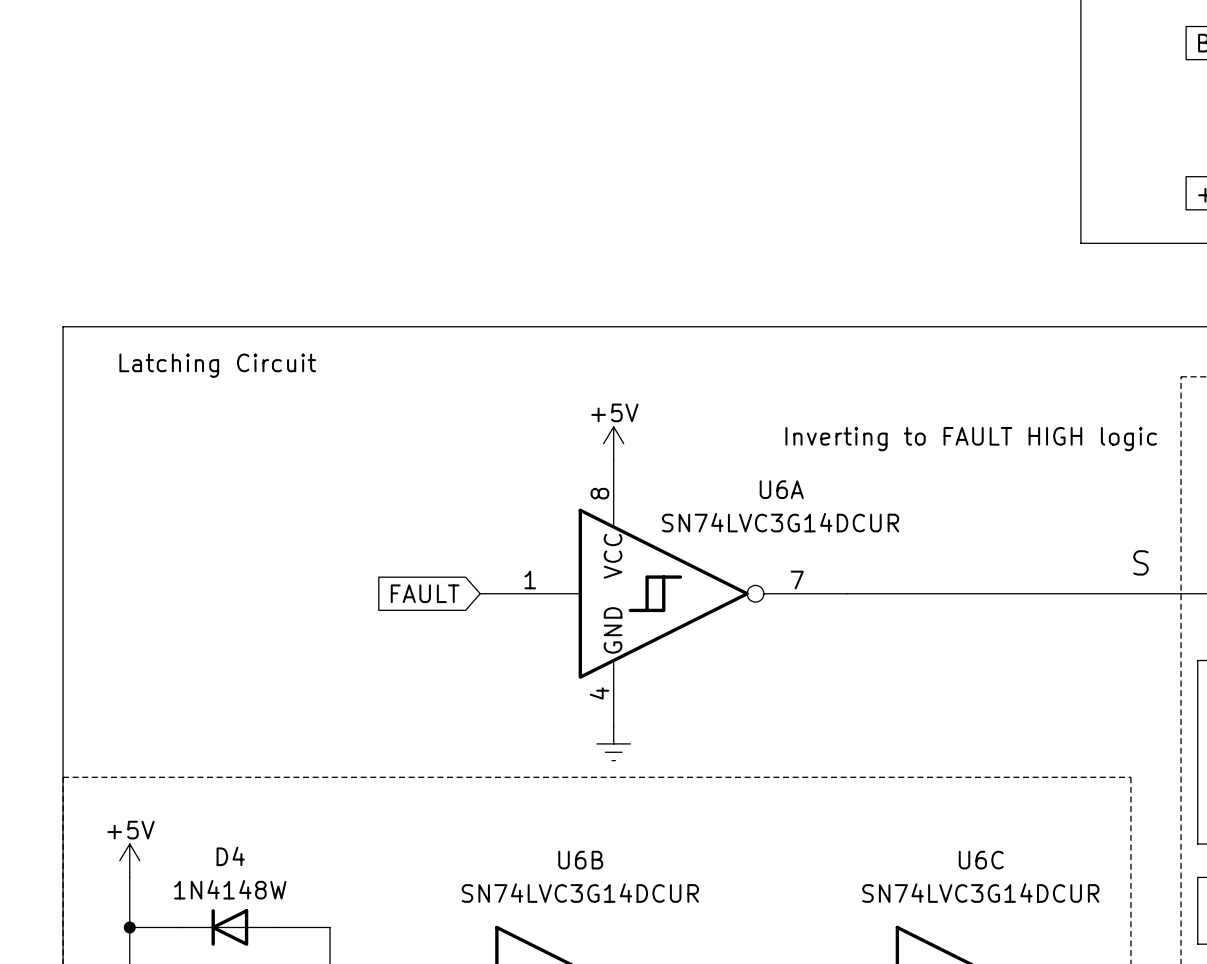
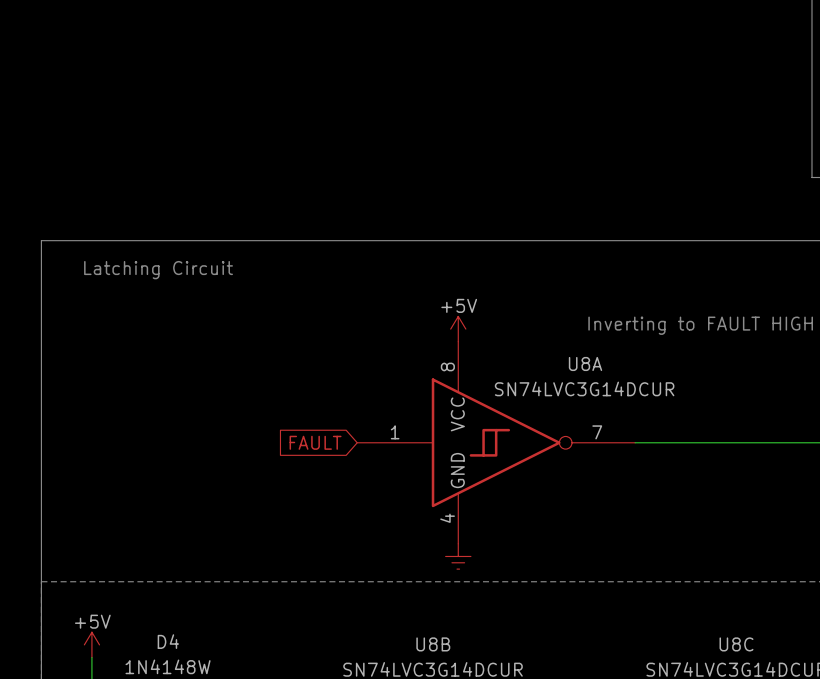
U6A name: U6A (781, 489) -> U8A (585, 363)
U6B name: U6B (580, 860) -> U8B (433, 644)
U6C name: U6C (981, 860) -> U8C (736, 644)

